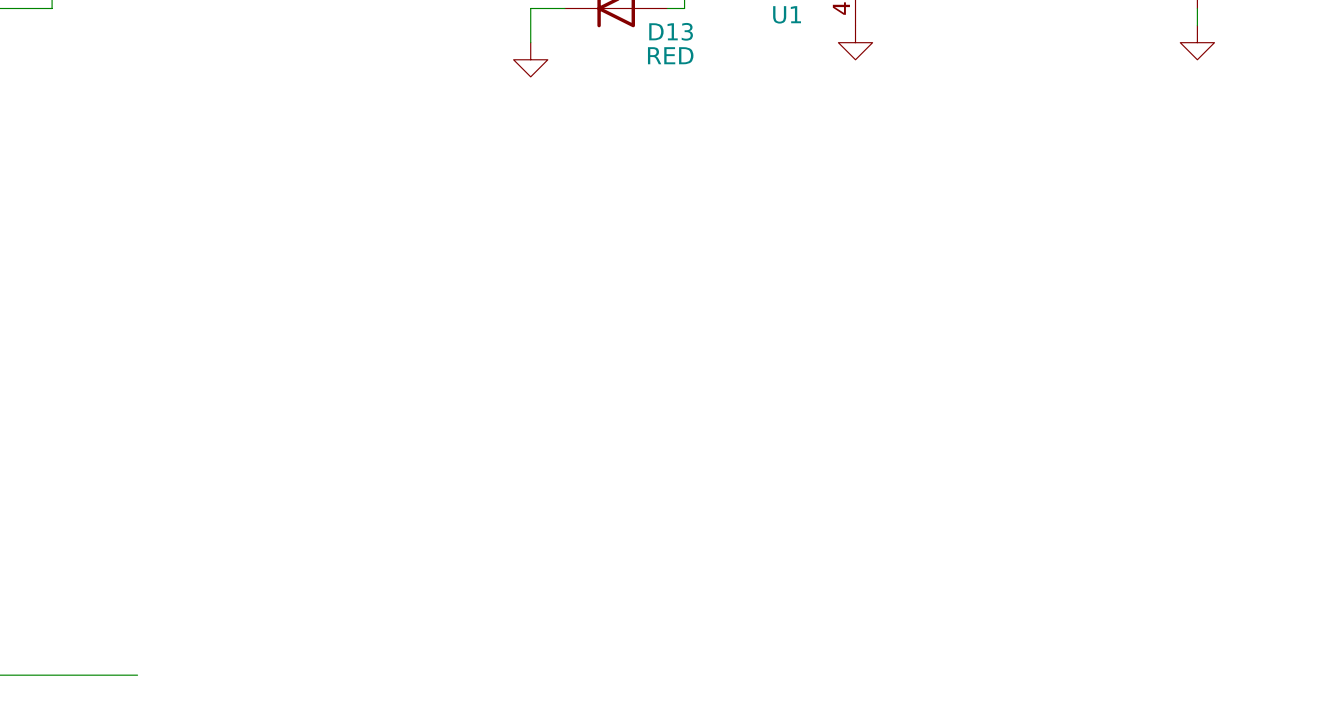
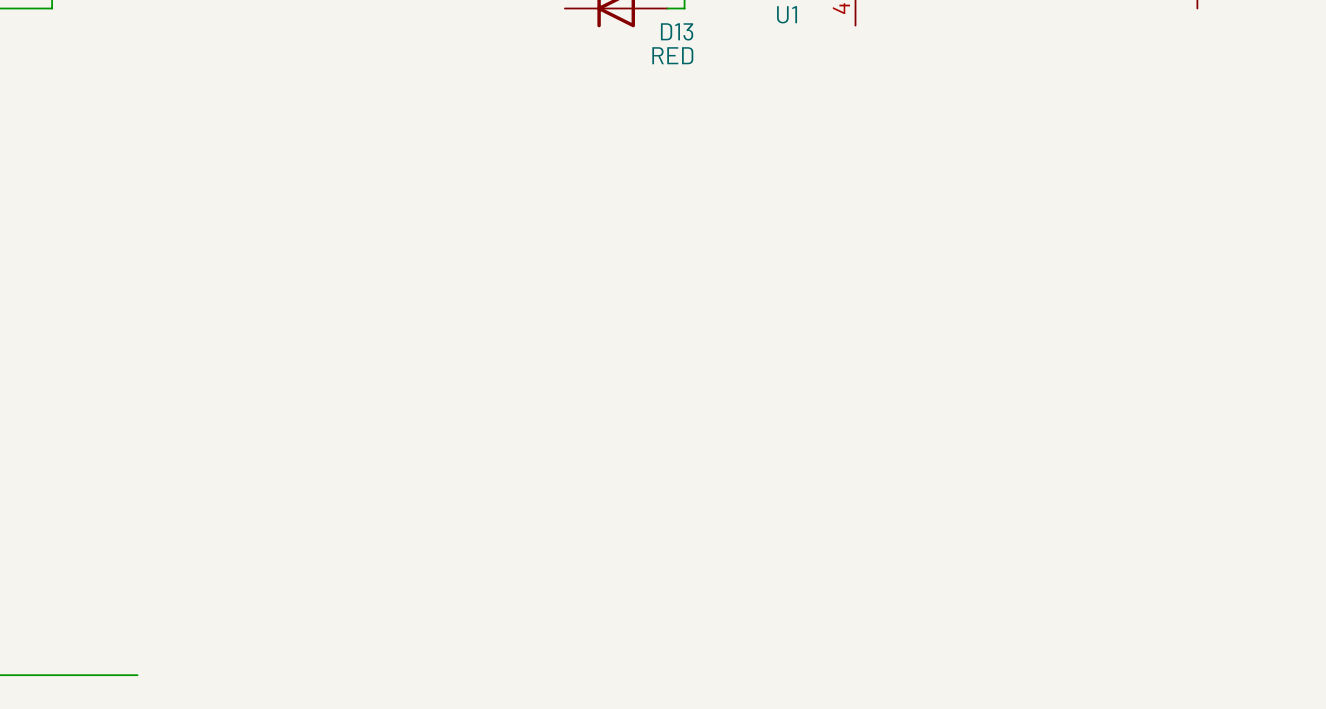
wire: (564, 8) (530, 8) (530, 42) -> none
wire: (1197, 8) (1197, 25) -> none
power symbol: (855, 42) -> none
power symbol: (1197, 42) -> none
power symbol: (530, 59) -> none

